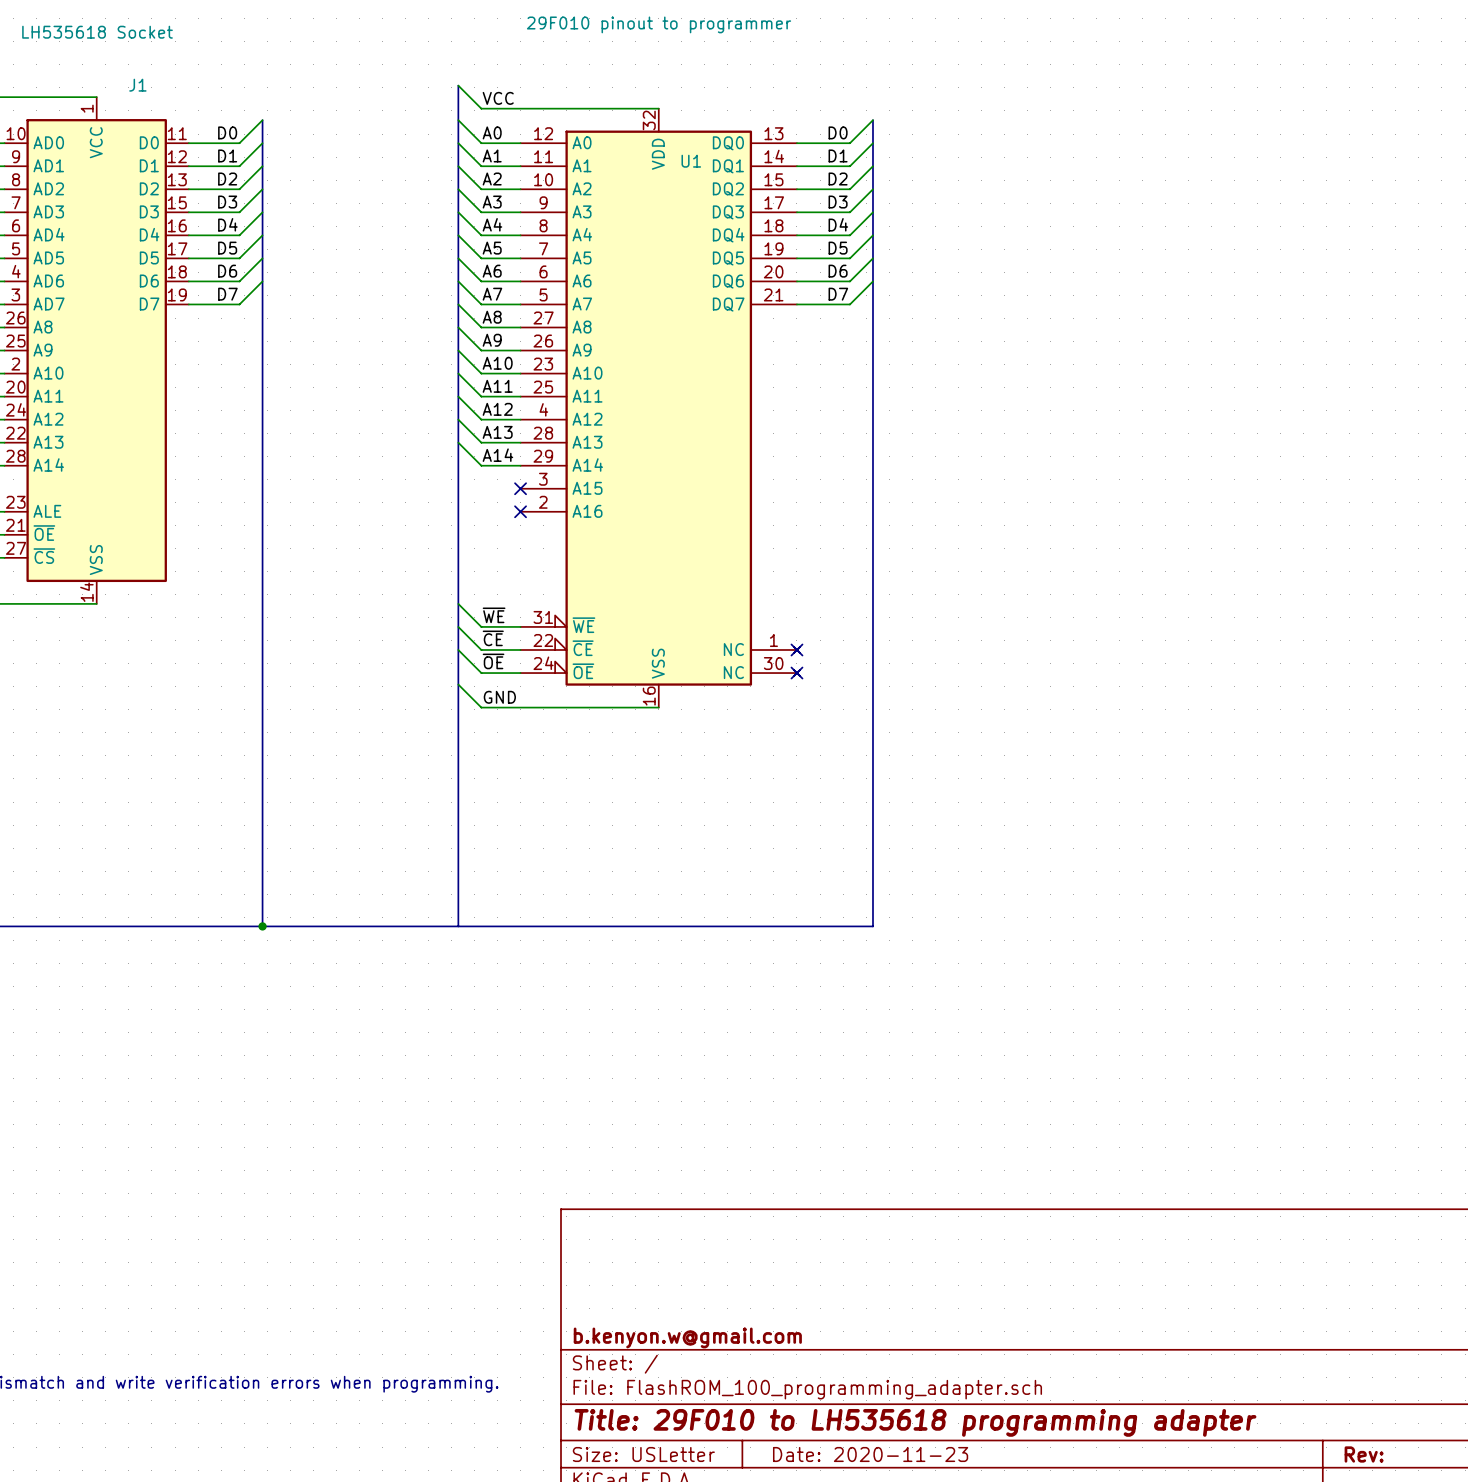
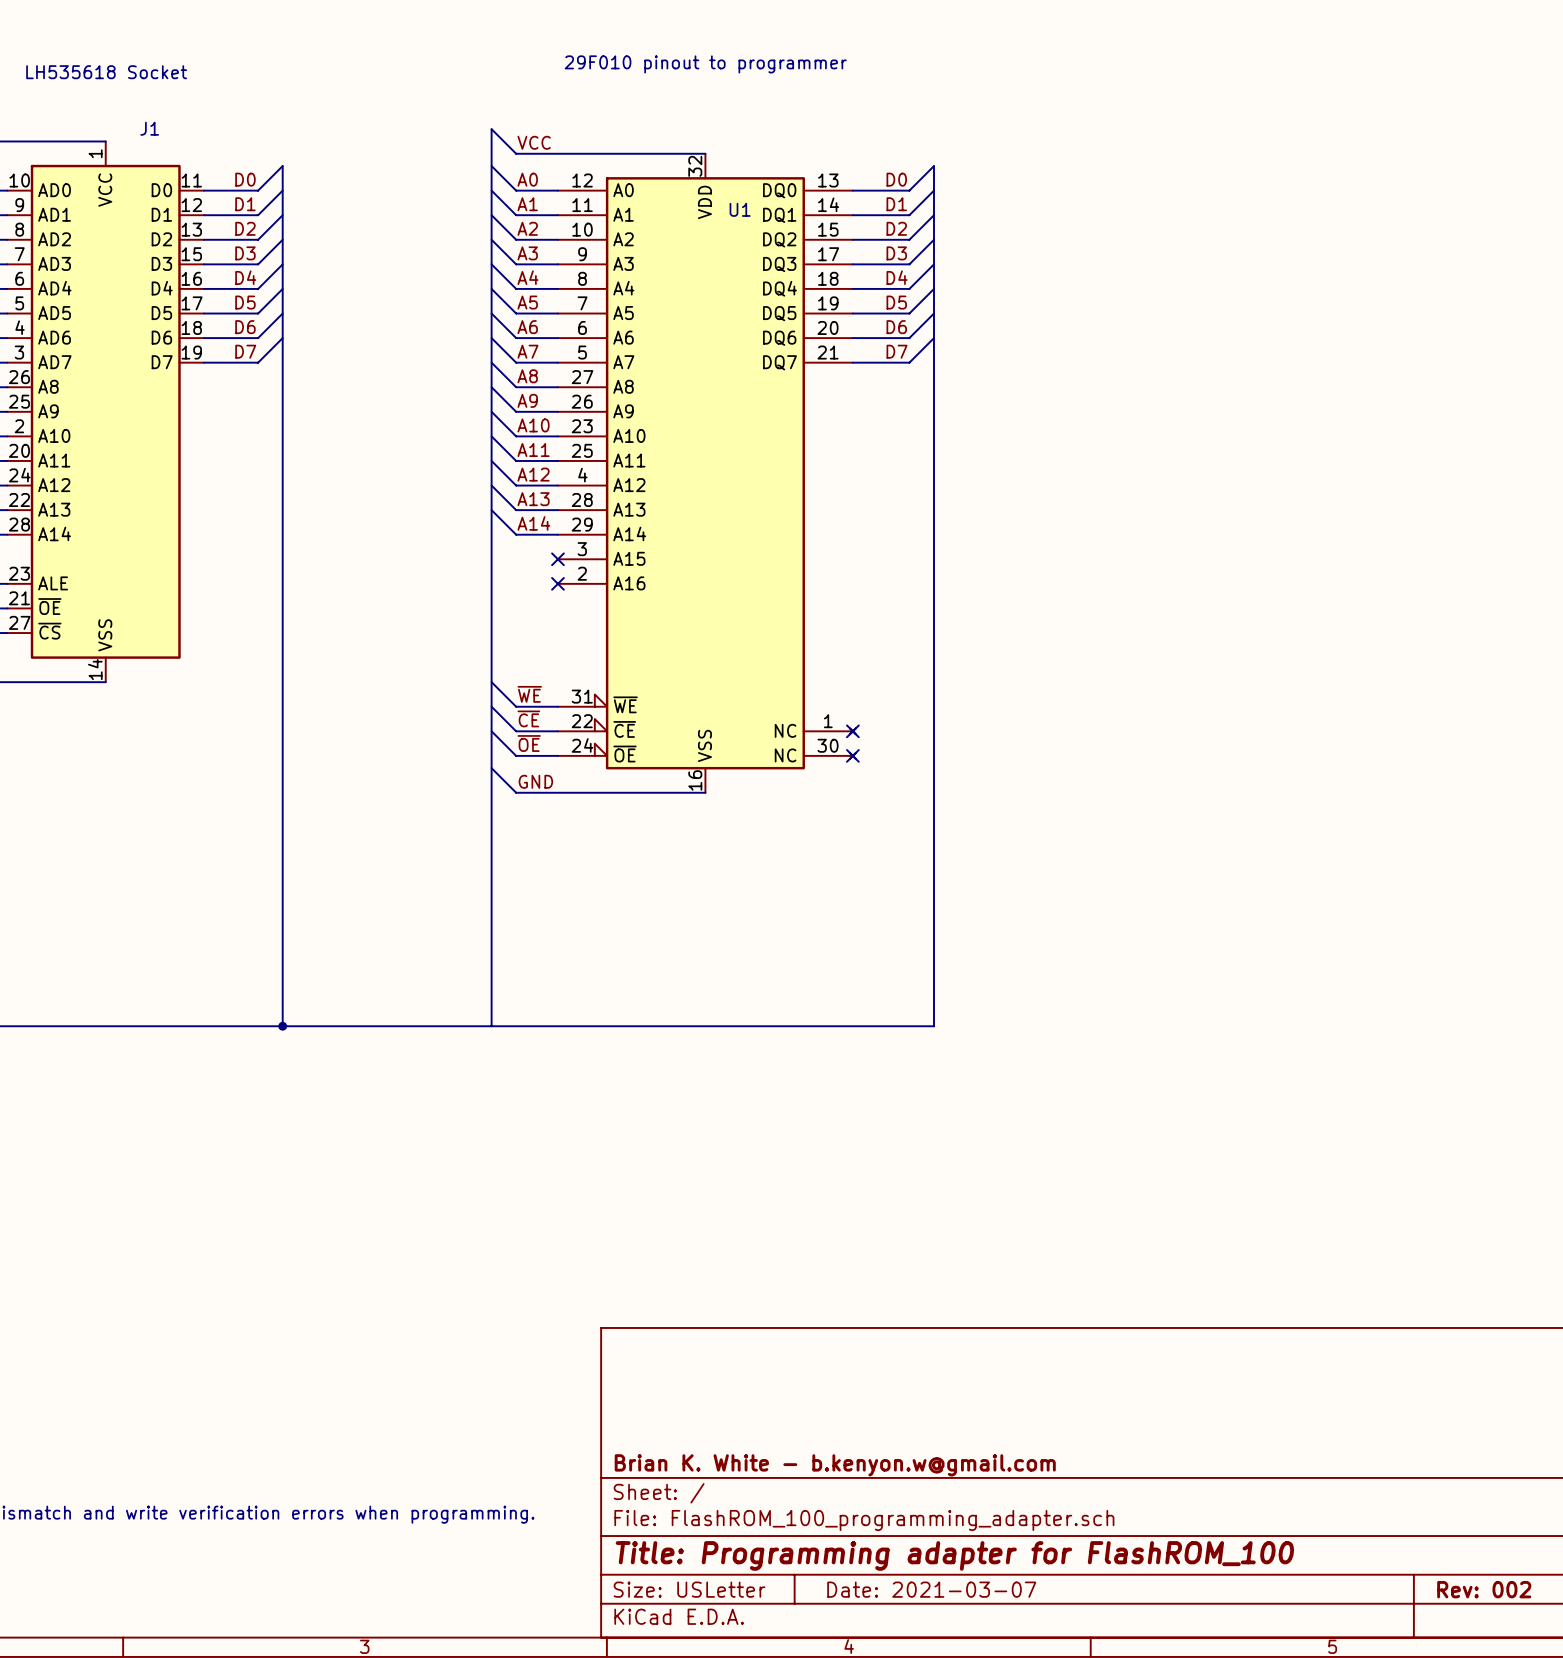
title block: b.kenyon.w@gmail.com (687, 1337) -> Brian K. White - b.kenyon.w@gmail.com (835, 1465)
title block: Title: 29F010 to LH535618 programming adapter (915, 1422) -> Title: Programming adapter for FlashROM_100 (954, 1555)
title block: Date: 2020-11-23 (870, 1454) -> Date: 2021-03-07 (931, 1589)
title block: Rev: (1364, 1454) -> Rev: 002 (1484, 1589)

